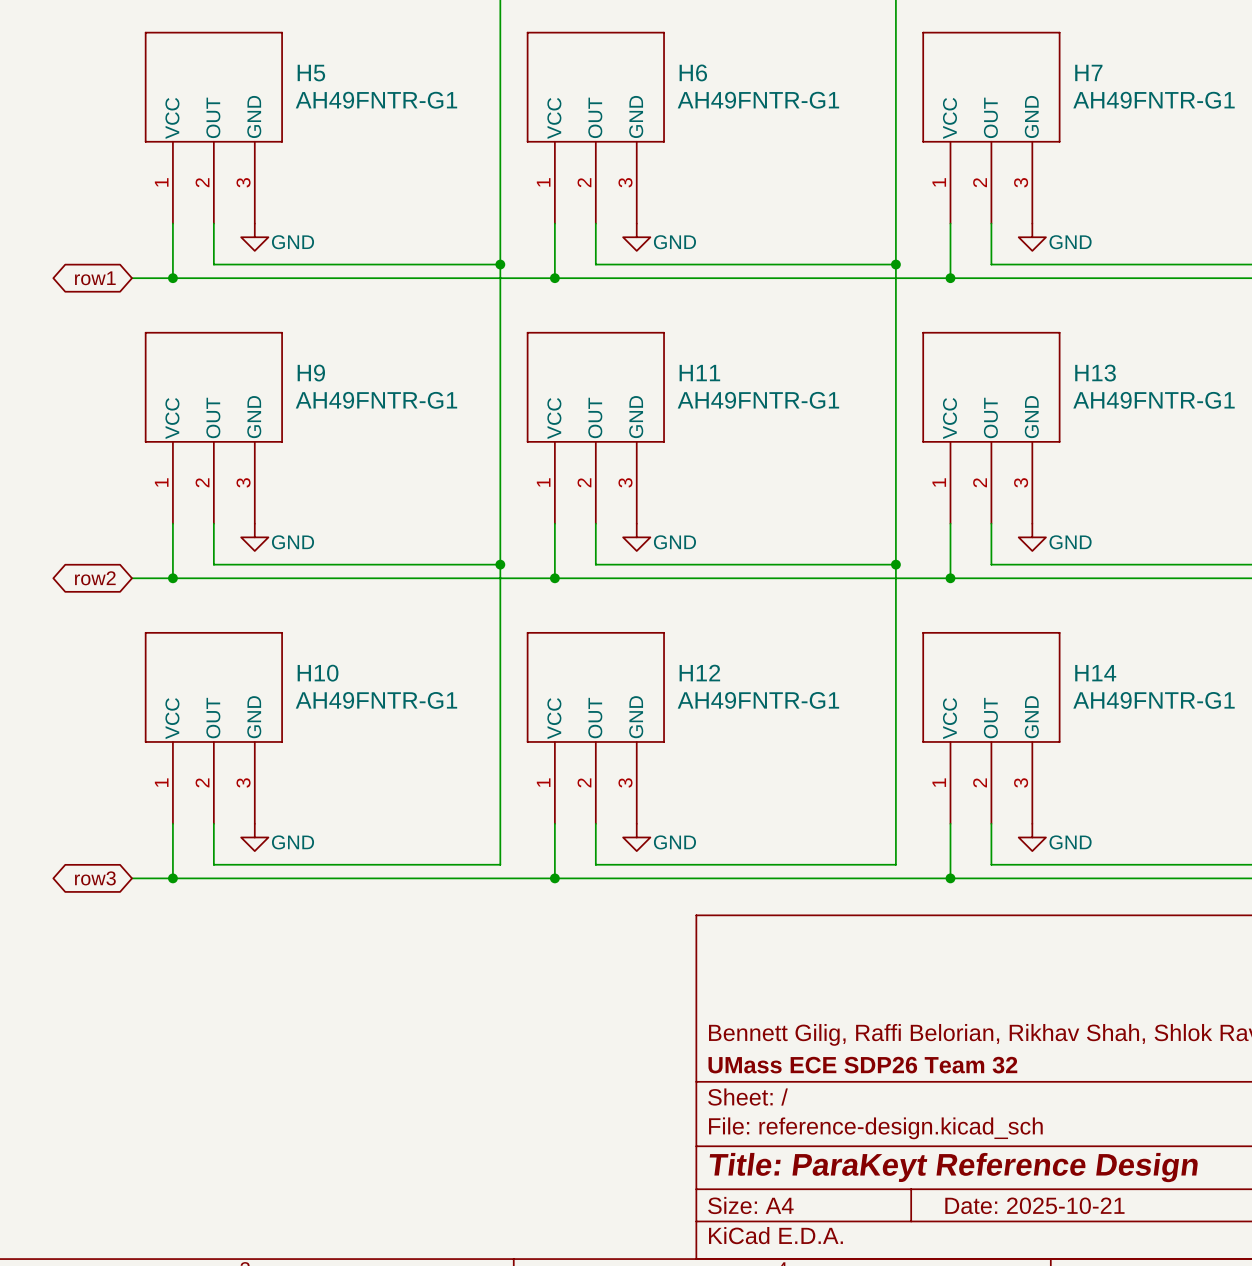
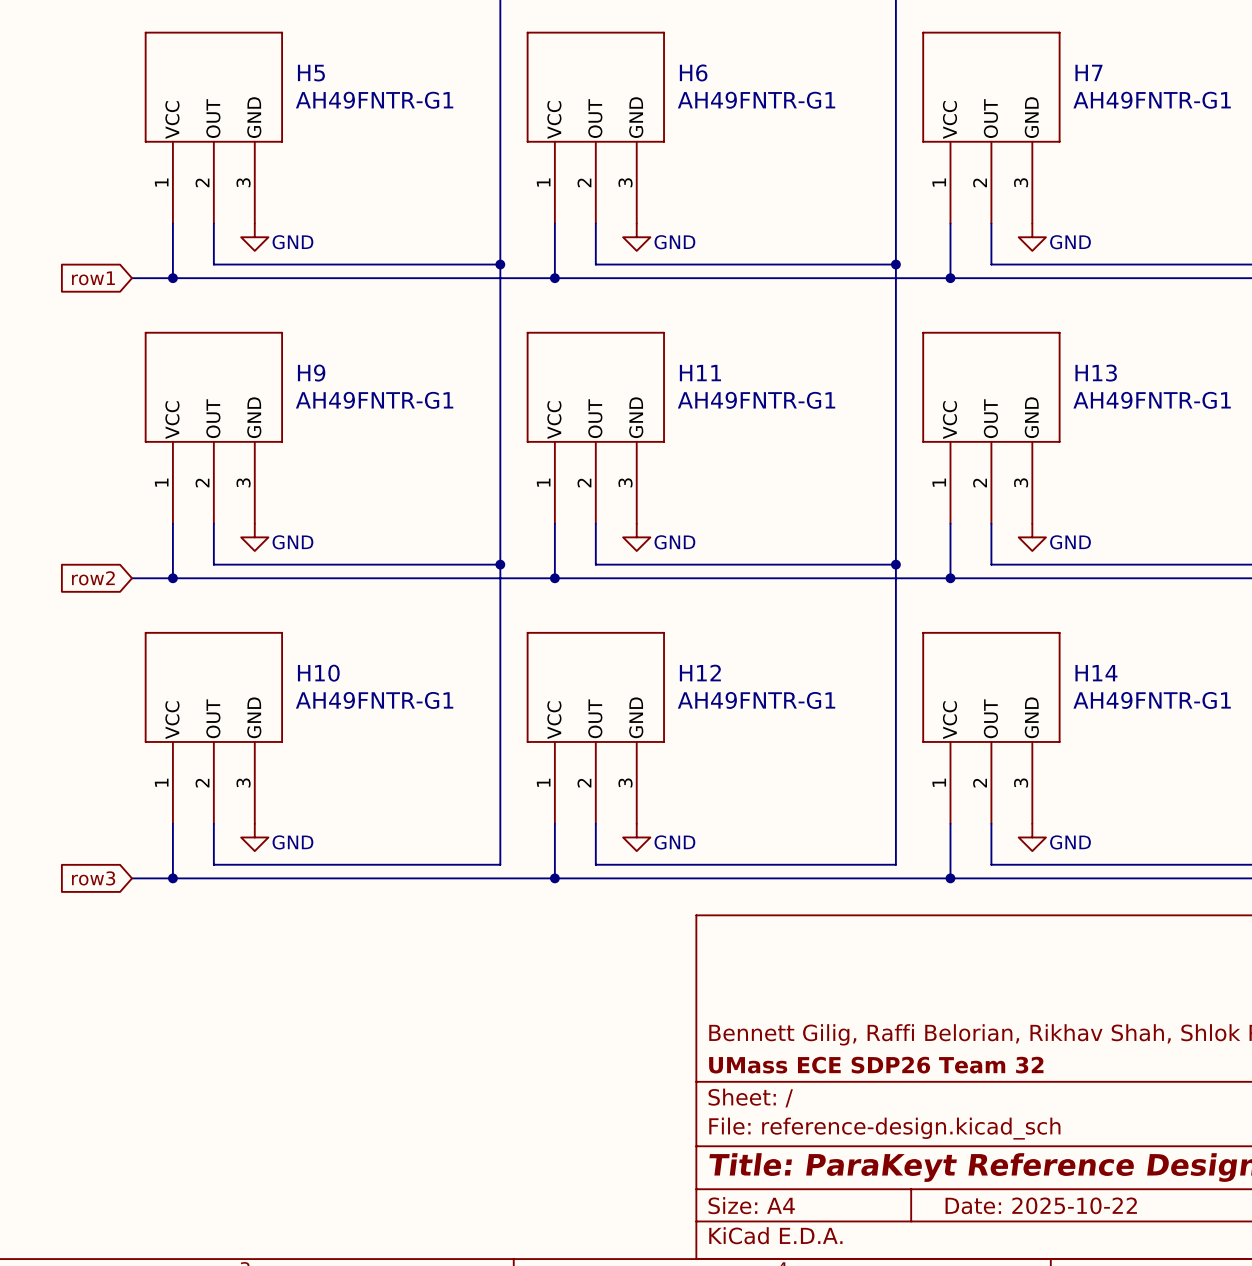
global label shape: bidirectional (95, 278) -> input (93, 278)
global label shape: bidirectional (95, 578) -> input (93, 578)
global label shape: bidirectional (95, 878) -> input (93, 878)
title block: Date: 2025-10-21 (1034, 1205) -> Date: 2025-10-22 (1041, 1205)

